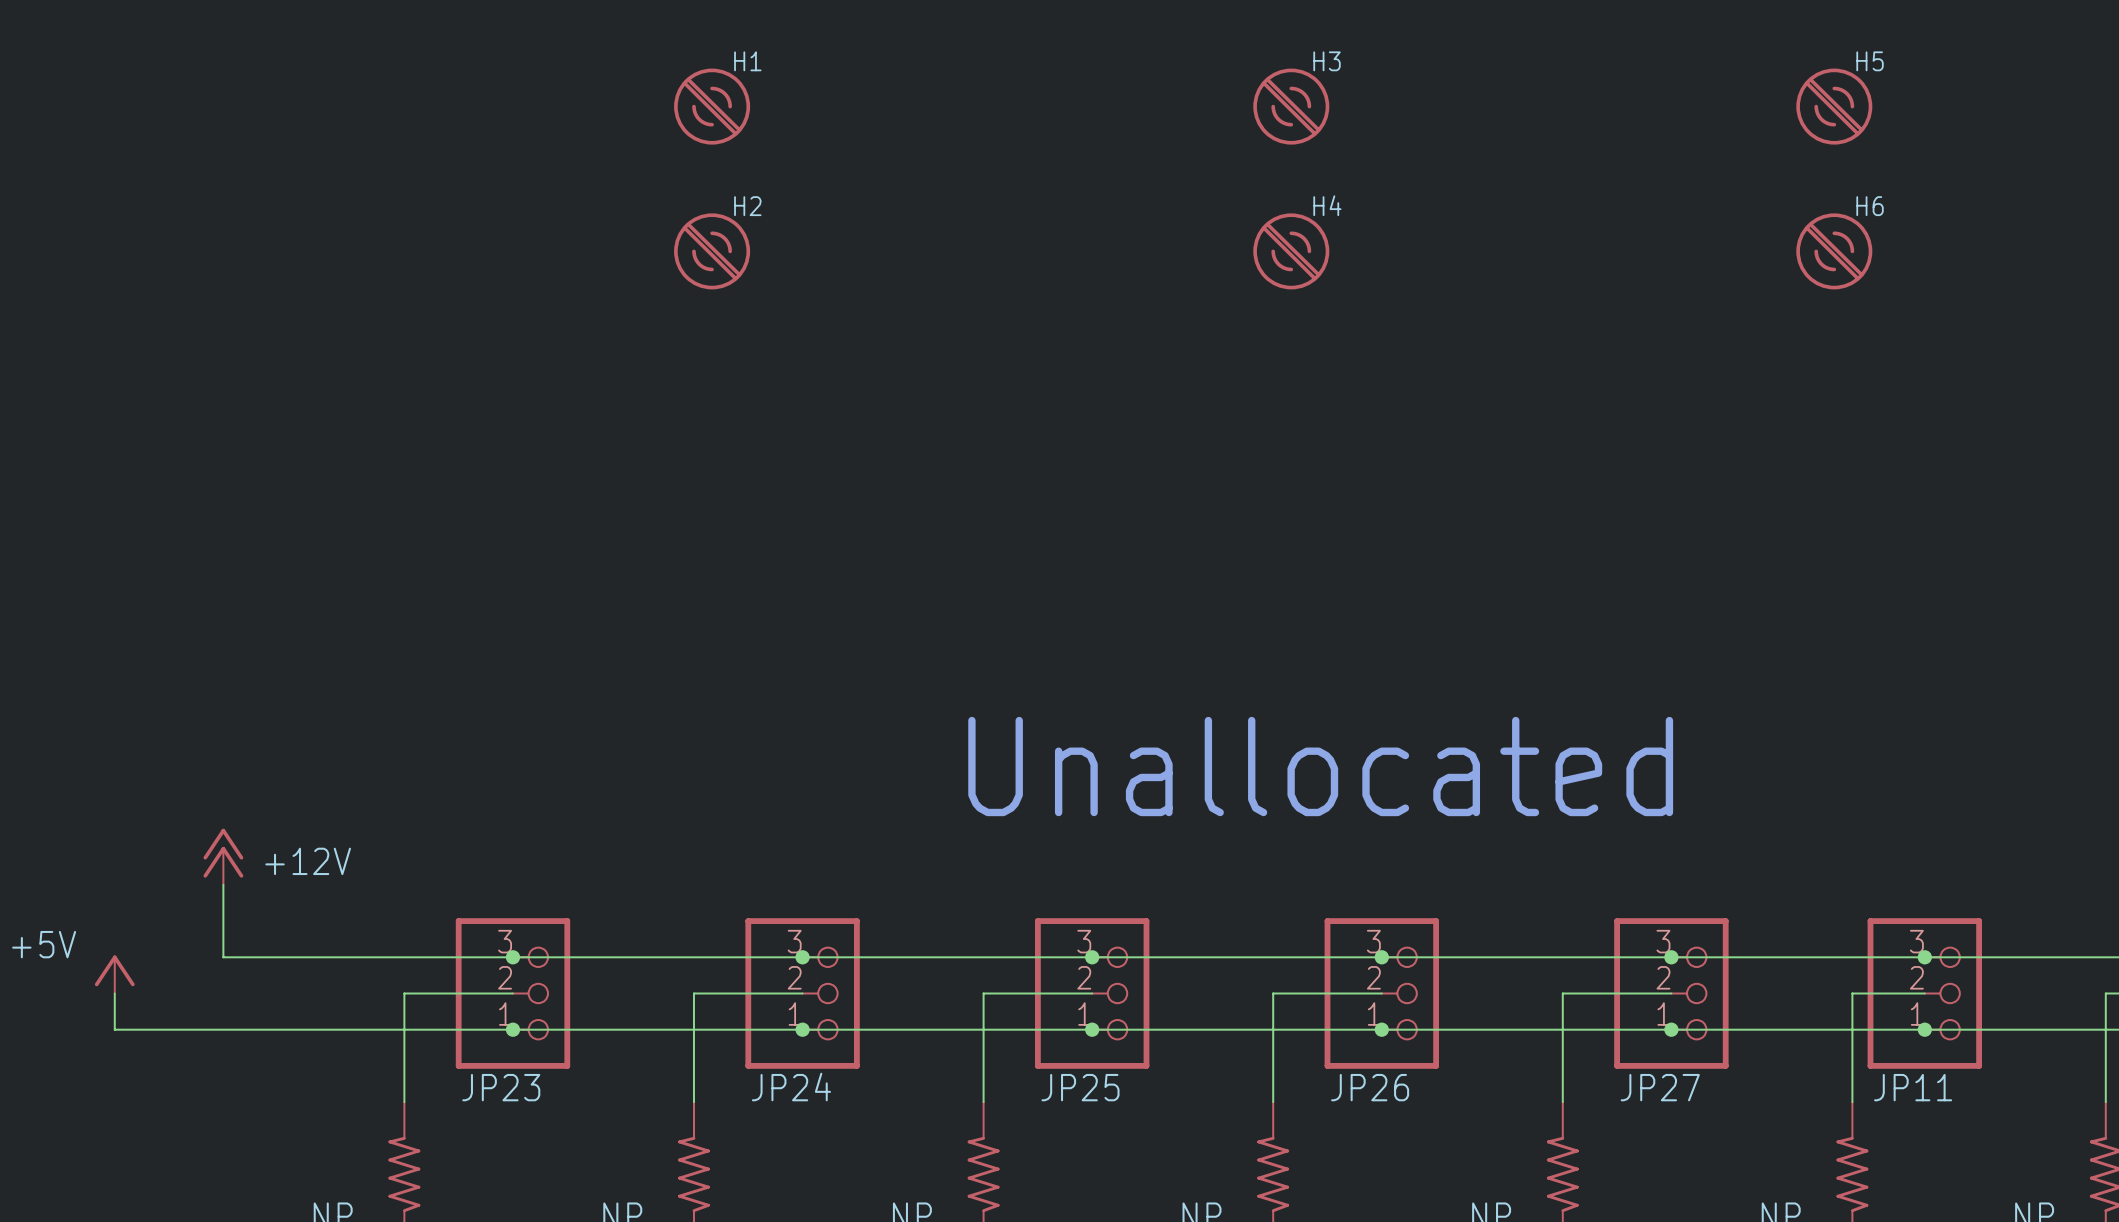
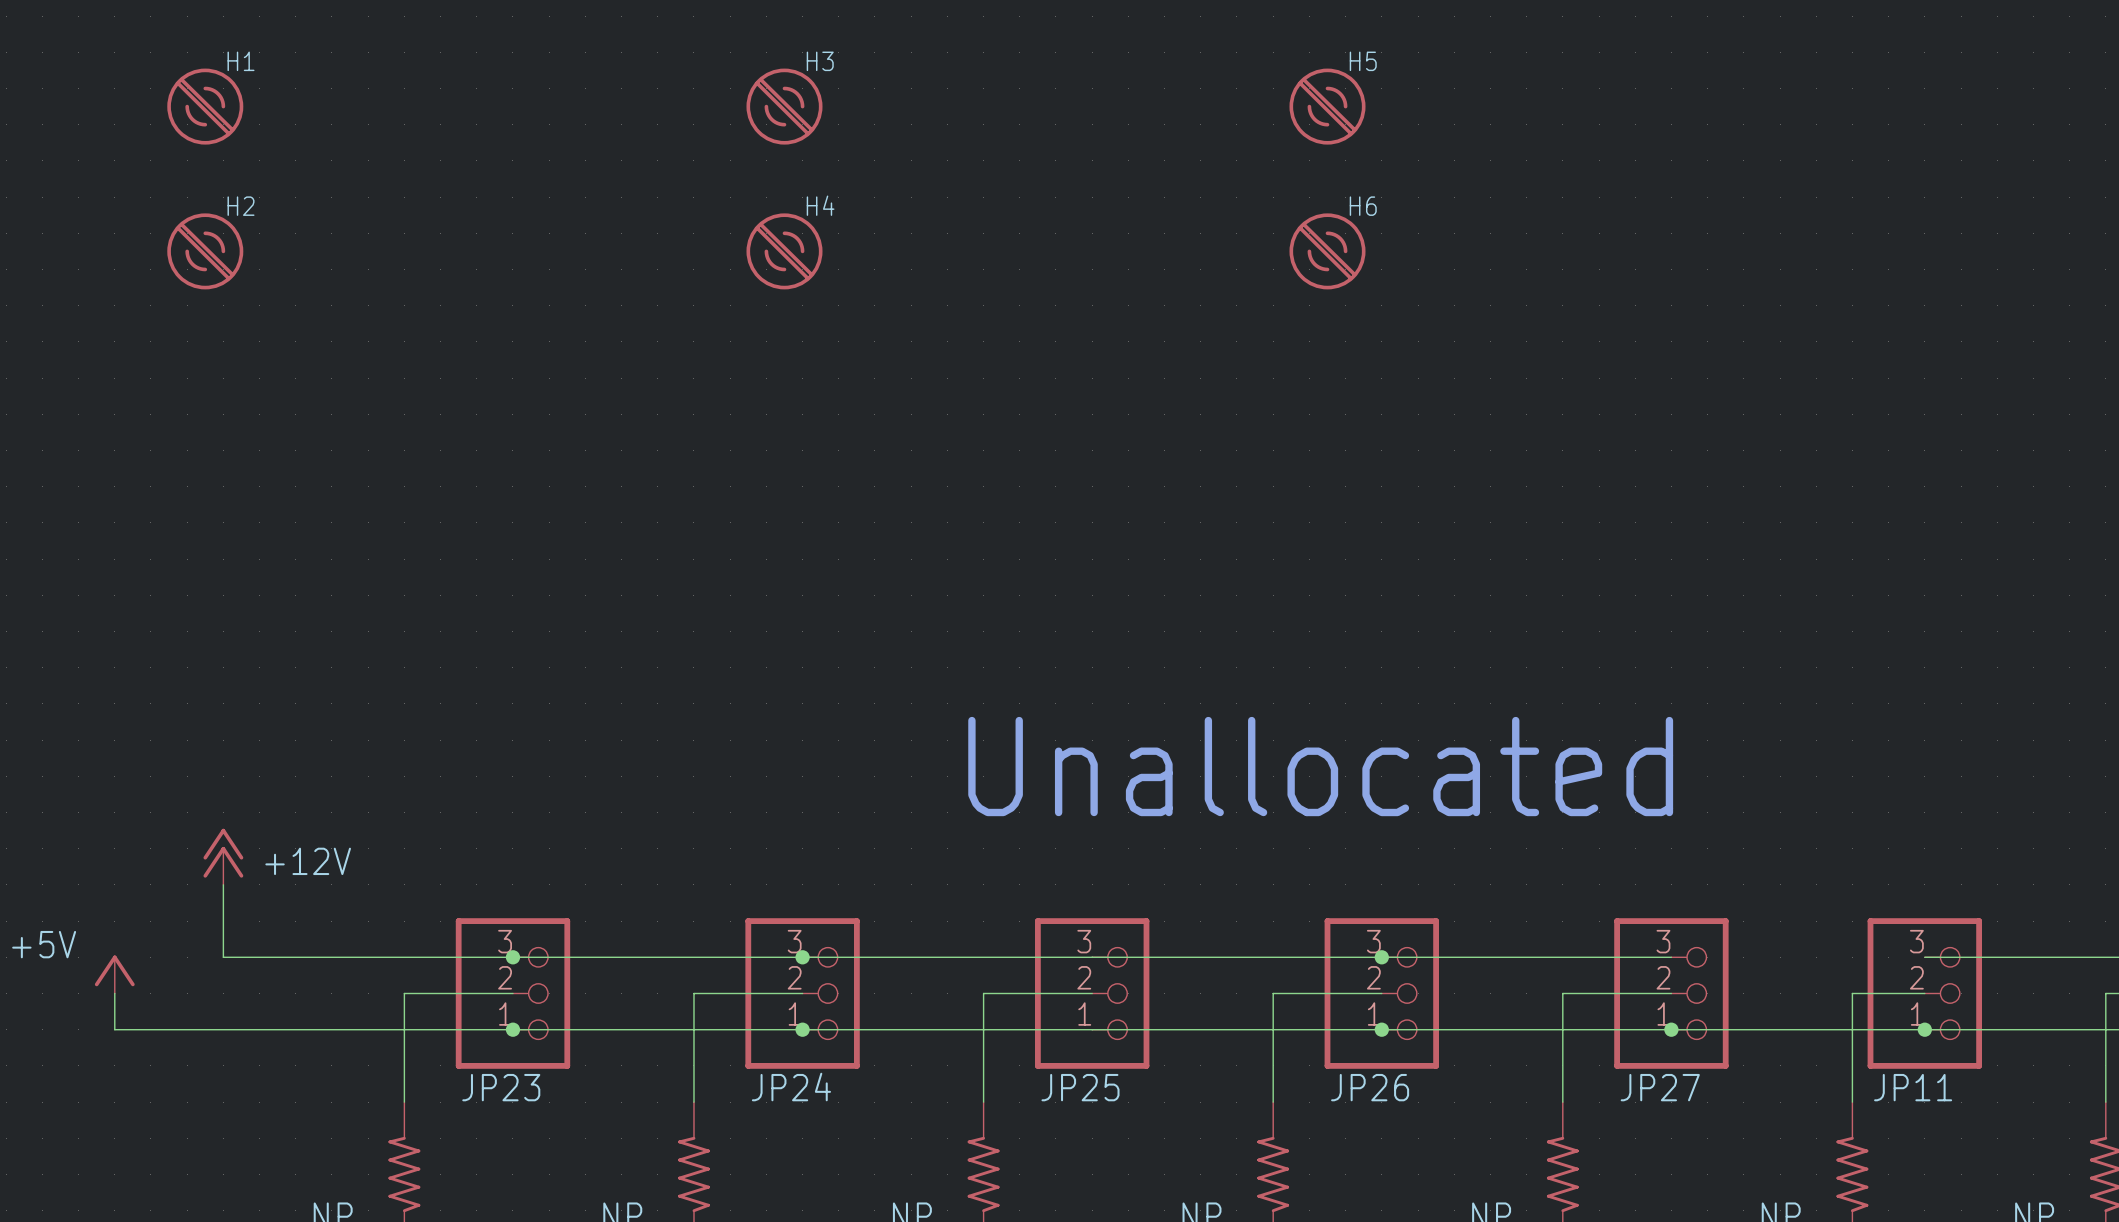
H1 position: (712, 106) -> (205, 106)
H3 position: (1291, 106) -> (784, 106)
H5 position: (1834, 106) -> (1327, 106)
H2 position: (712, 251) -> (205, 251)
H4 position: (1291, 251) -> (784, 251)
H6 position: (1834, 251) -> (1327, 251)
junction: (1092, 957) -> none
wire: (1671, 957) (1924, 957) -> none
junction: (1671, 957) -> none
junction: (1924, 957) -> none
junction: (1092, 1029) -> none

